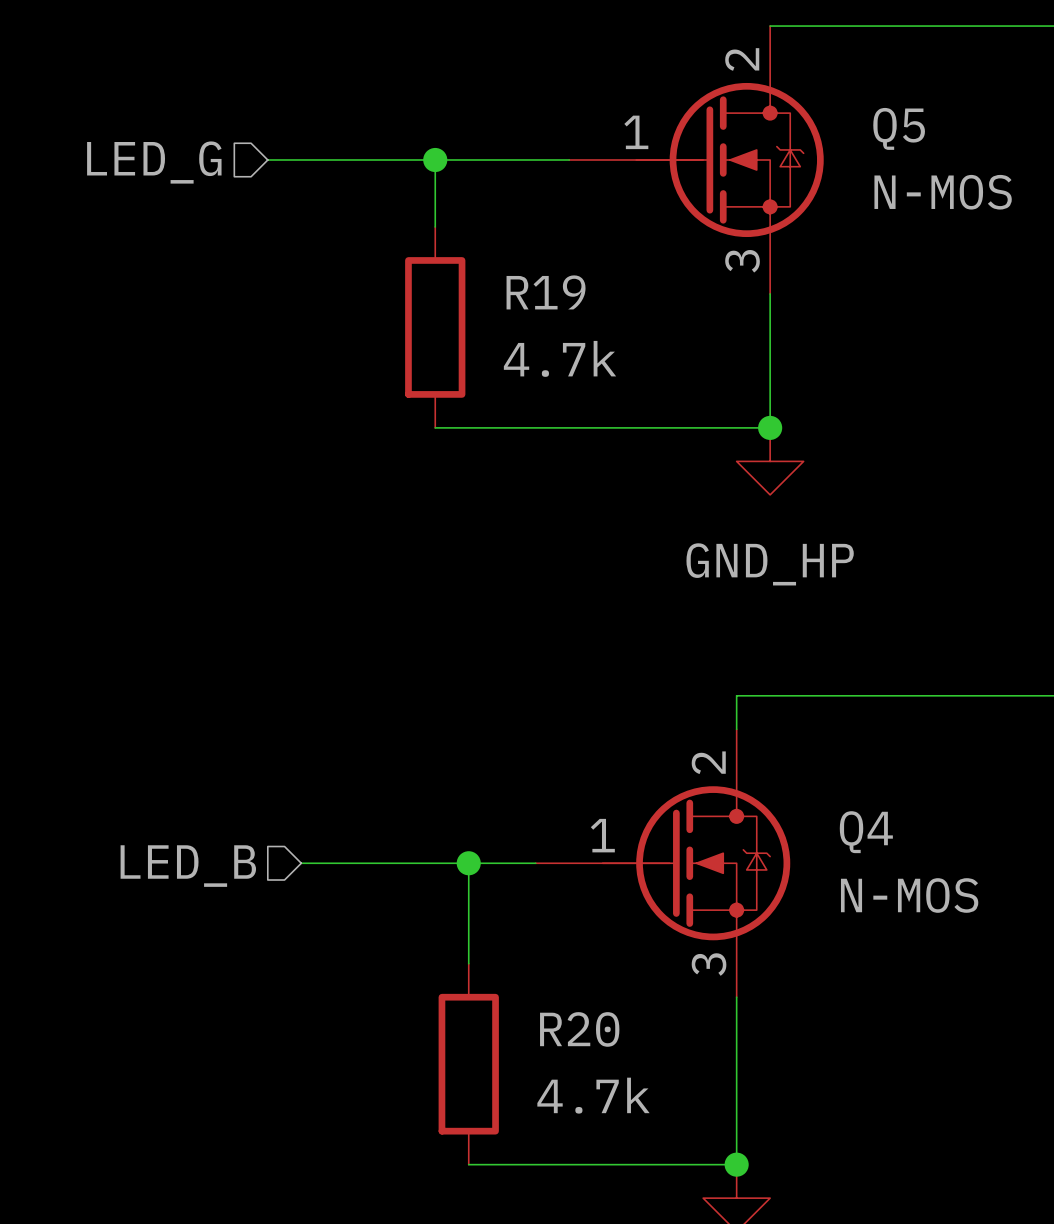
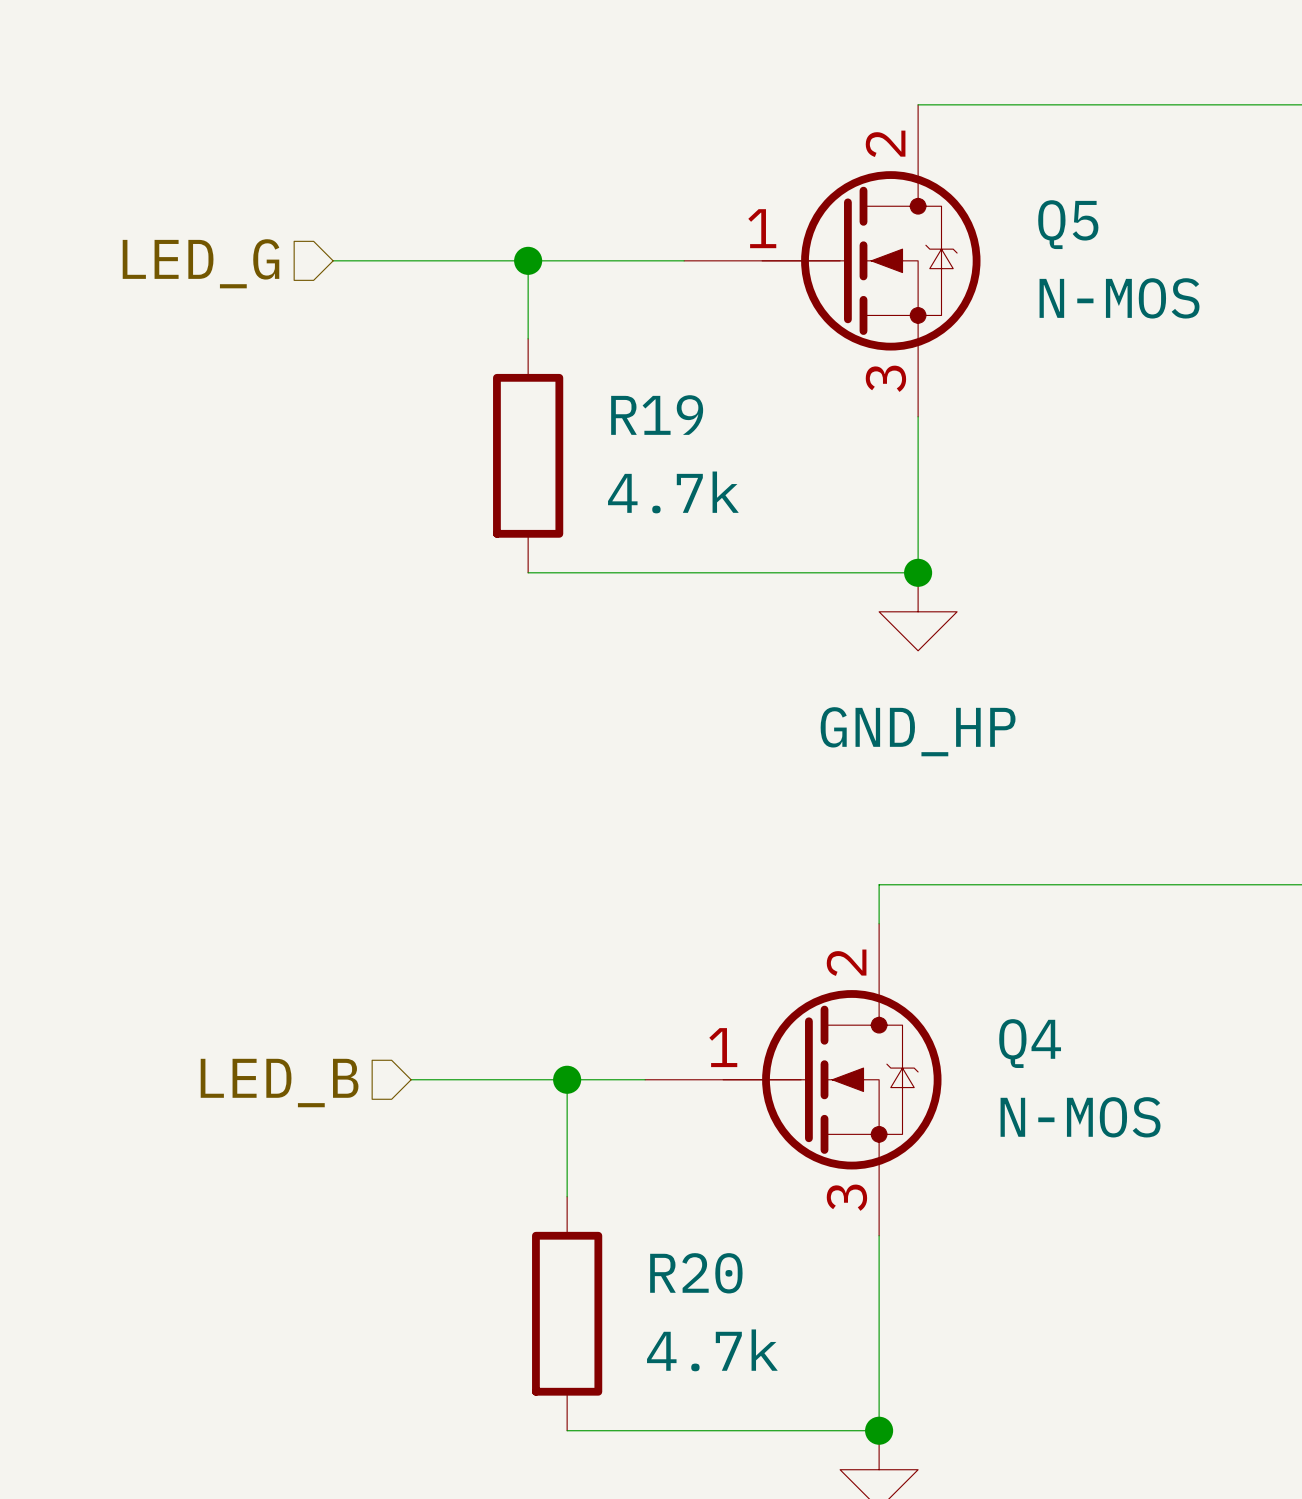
wire: (301, 863) (334, 863) -> none
hierarchical label position: LED_B (188, 866) -> LED_B (279, 1083)

